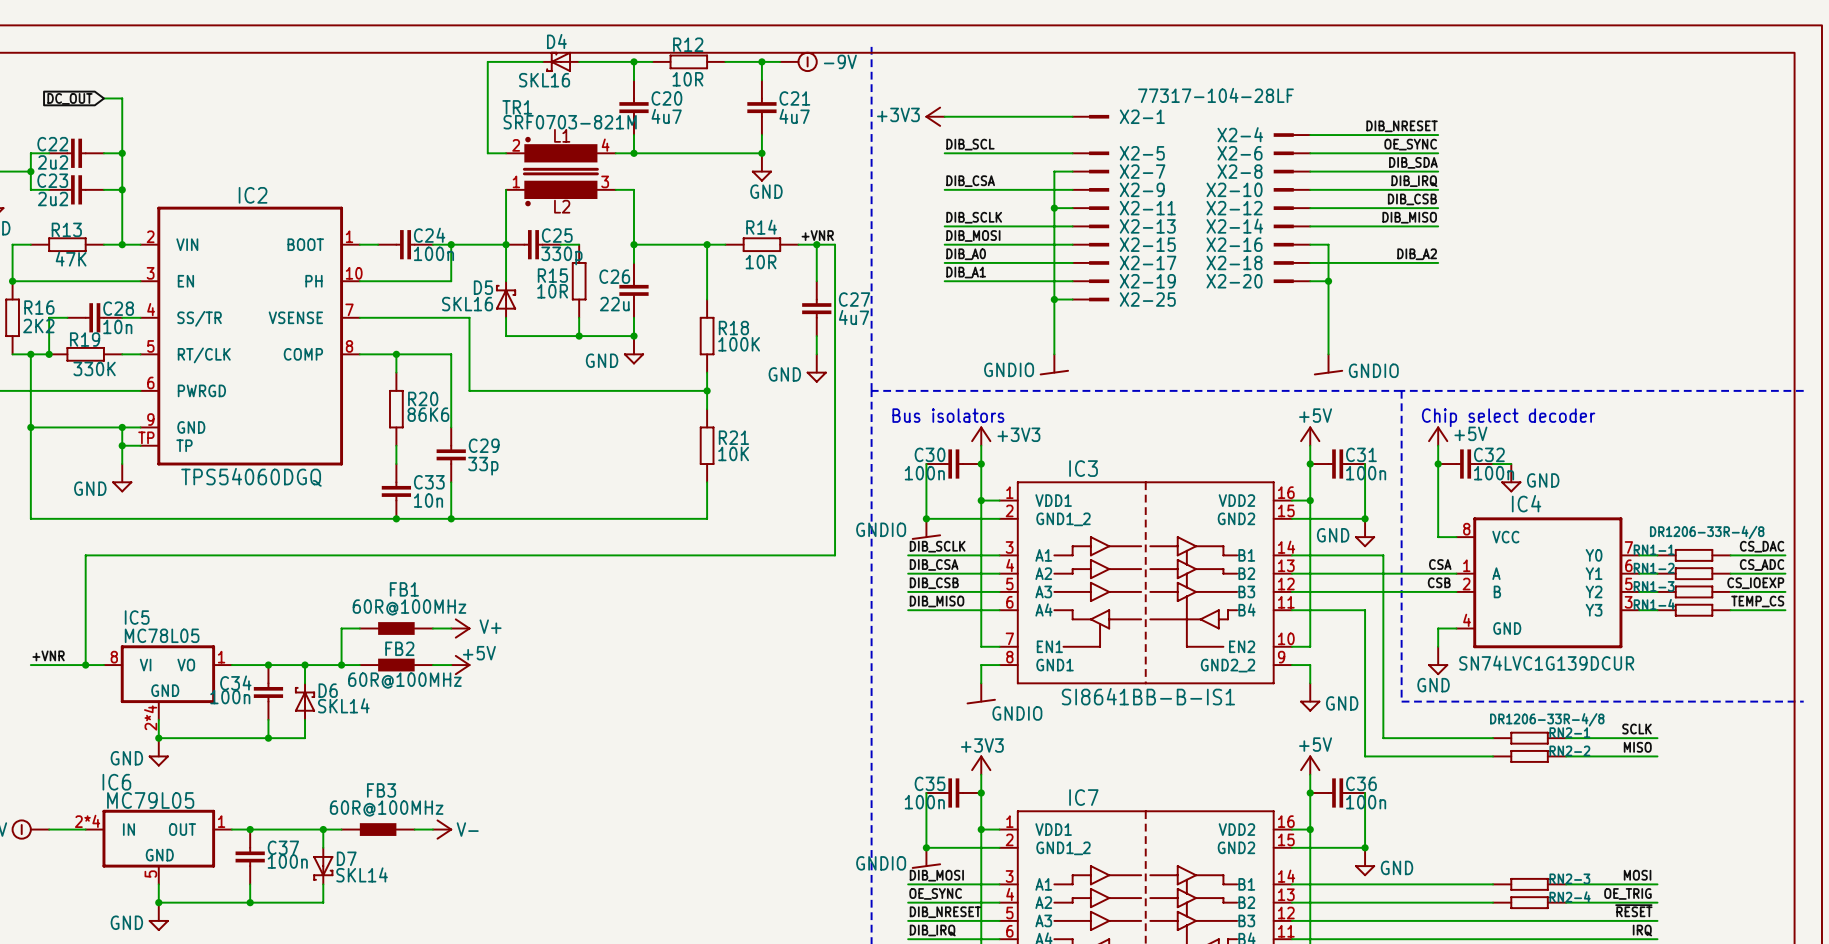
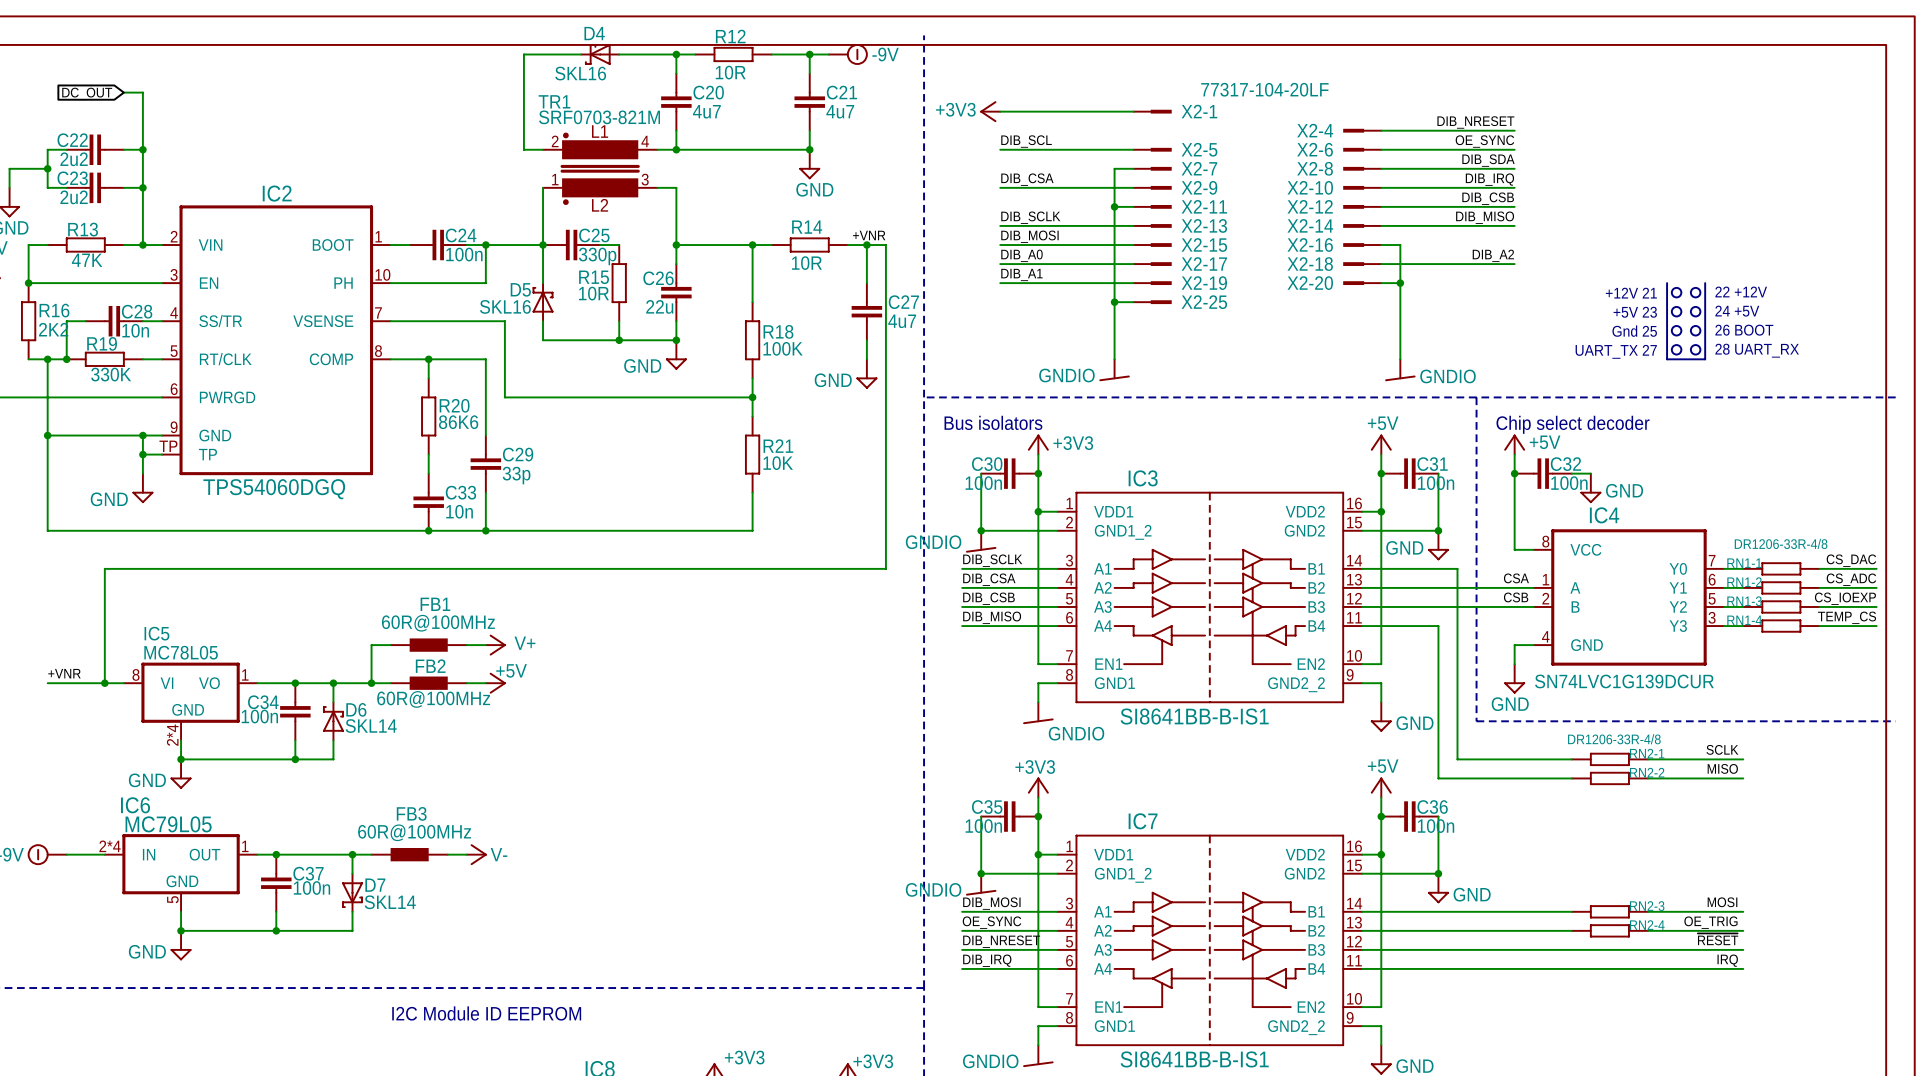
X2-1 value: 77317-104-28LF (1215, 95) -> 77317-104-20LF (1264, 89)
line: none -> (1667, 283) (1667, 359) (1705, 359) (1705, 283)
drawing: none -> [1671, 287, 1701, 356]
text: none -> 22 +12V (1741, 291)
text: none -> +12V 21 (1631, 293)
text: none -> 24 +5V (1737, 311)
text: none -> +5V 23 (1635, 312)
text: none -> 26 BOOT (1744, 330)
text: none -> Gnd 25 (1634, 331)
text: none -> 28 UART_RX (1757, 350)
text: none -> UART_TX 27 (1616, 351)

